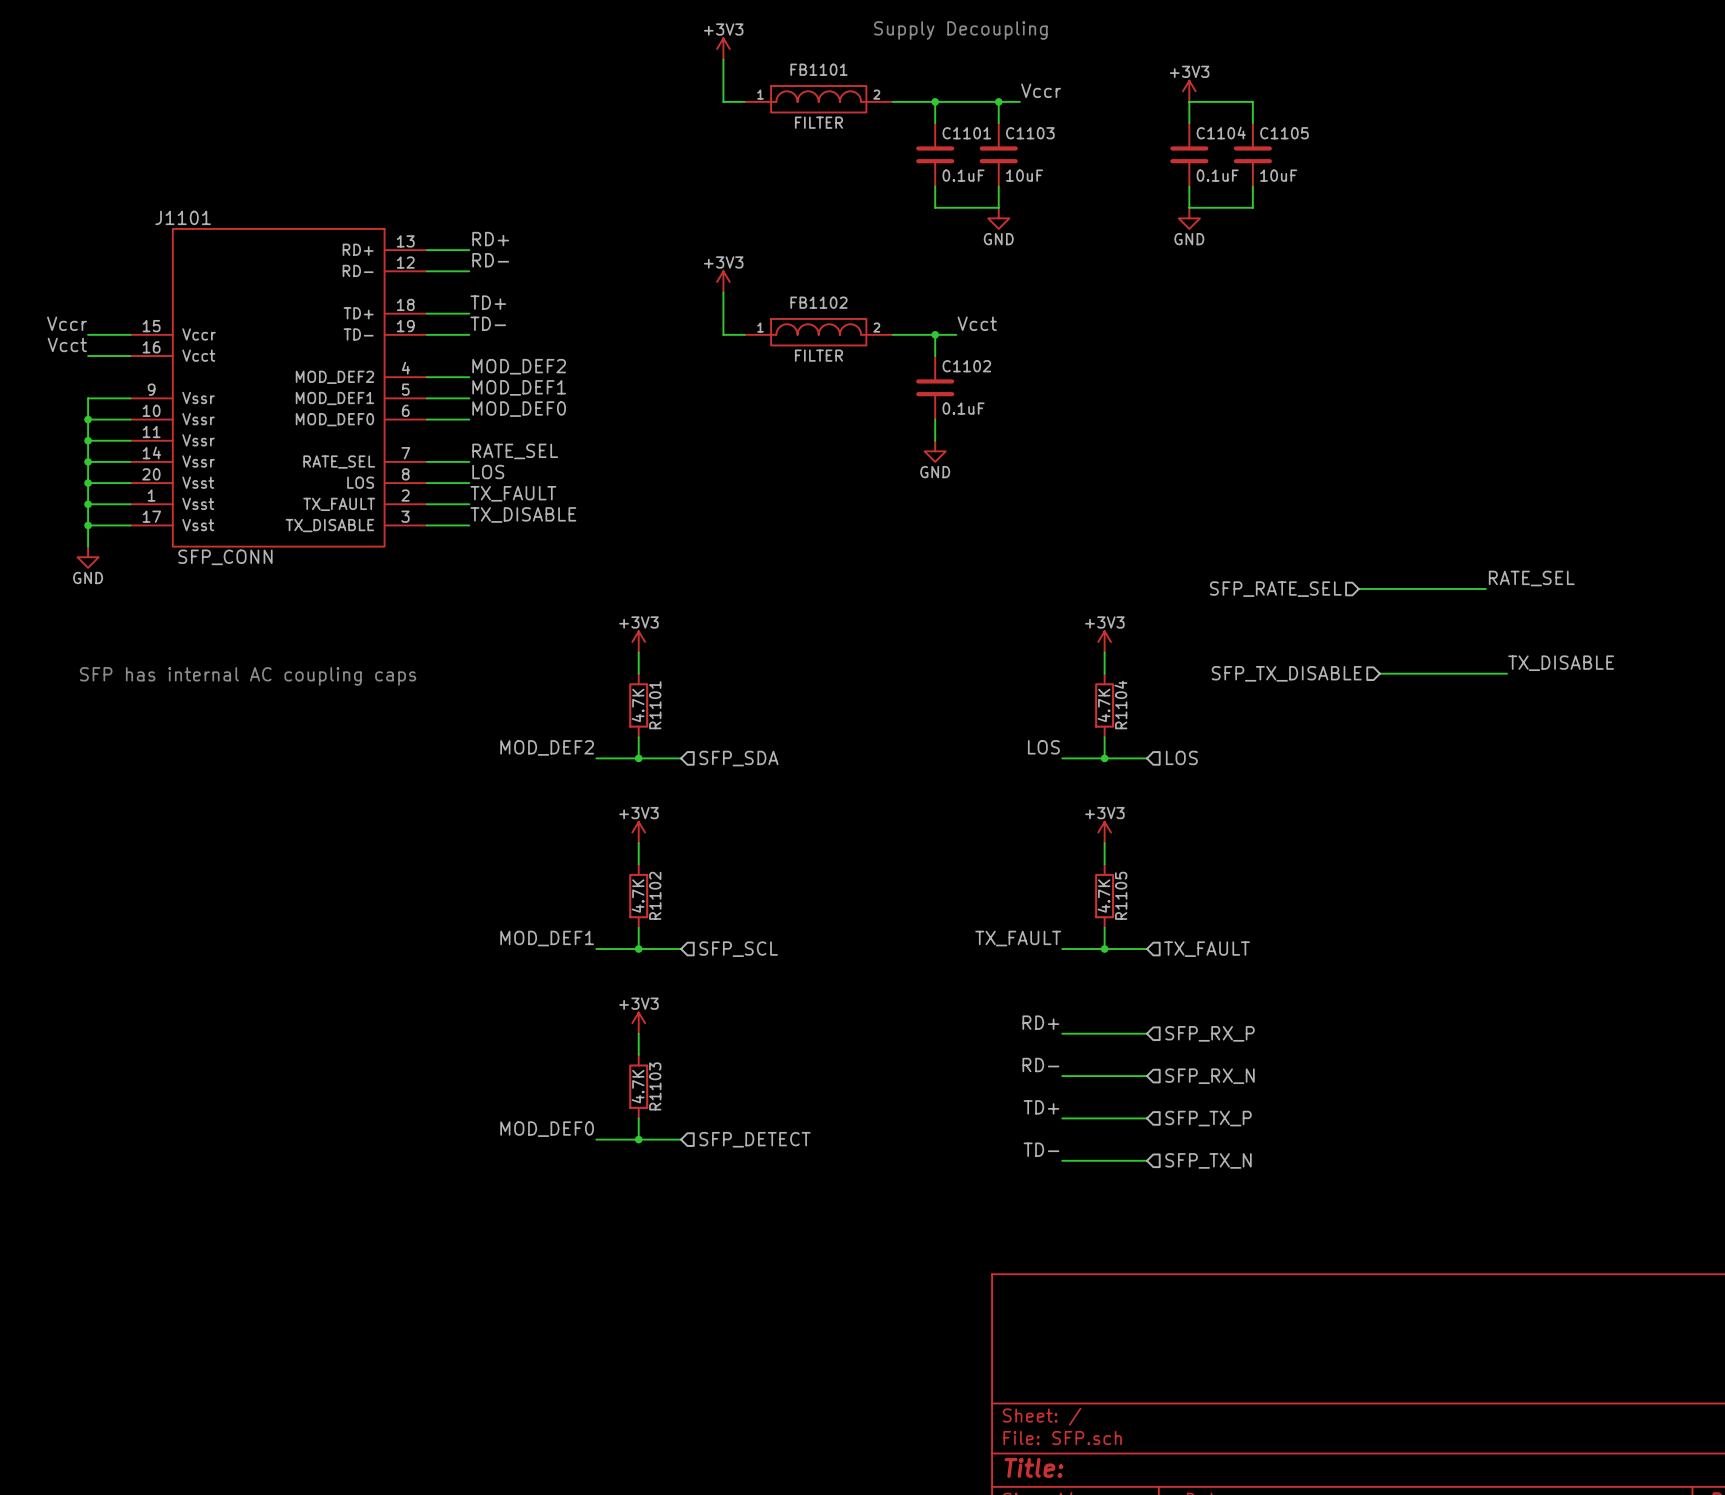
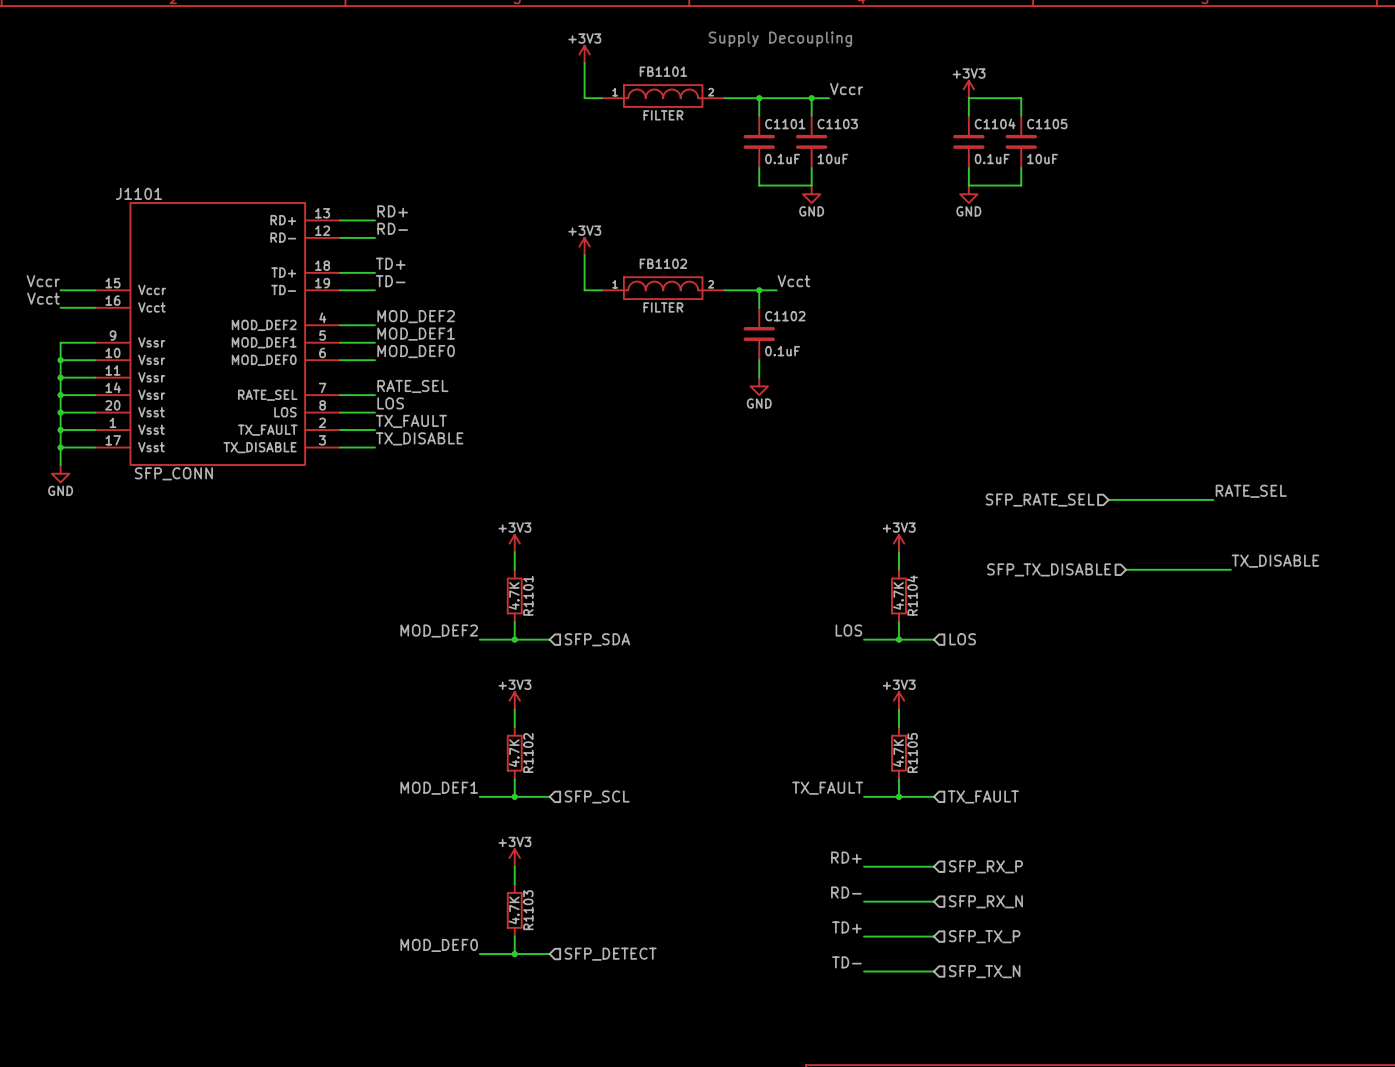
text: SFP has internal AC coupling caps (248, 676) -> none

